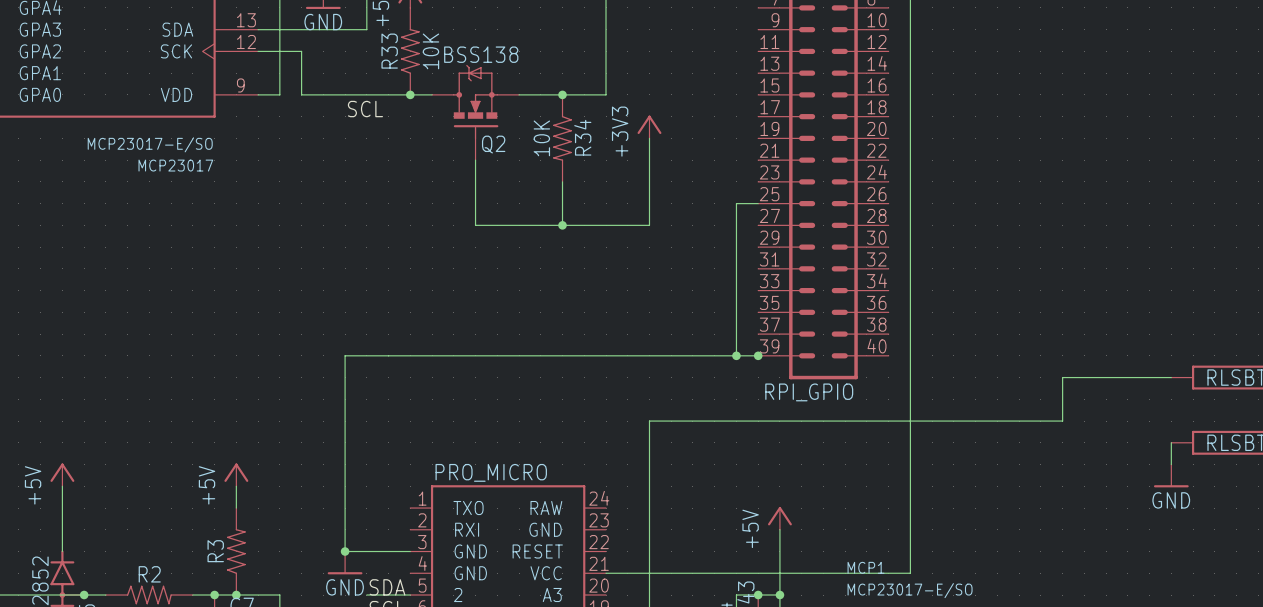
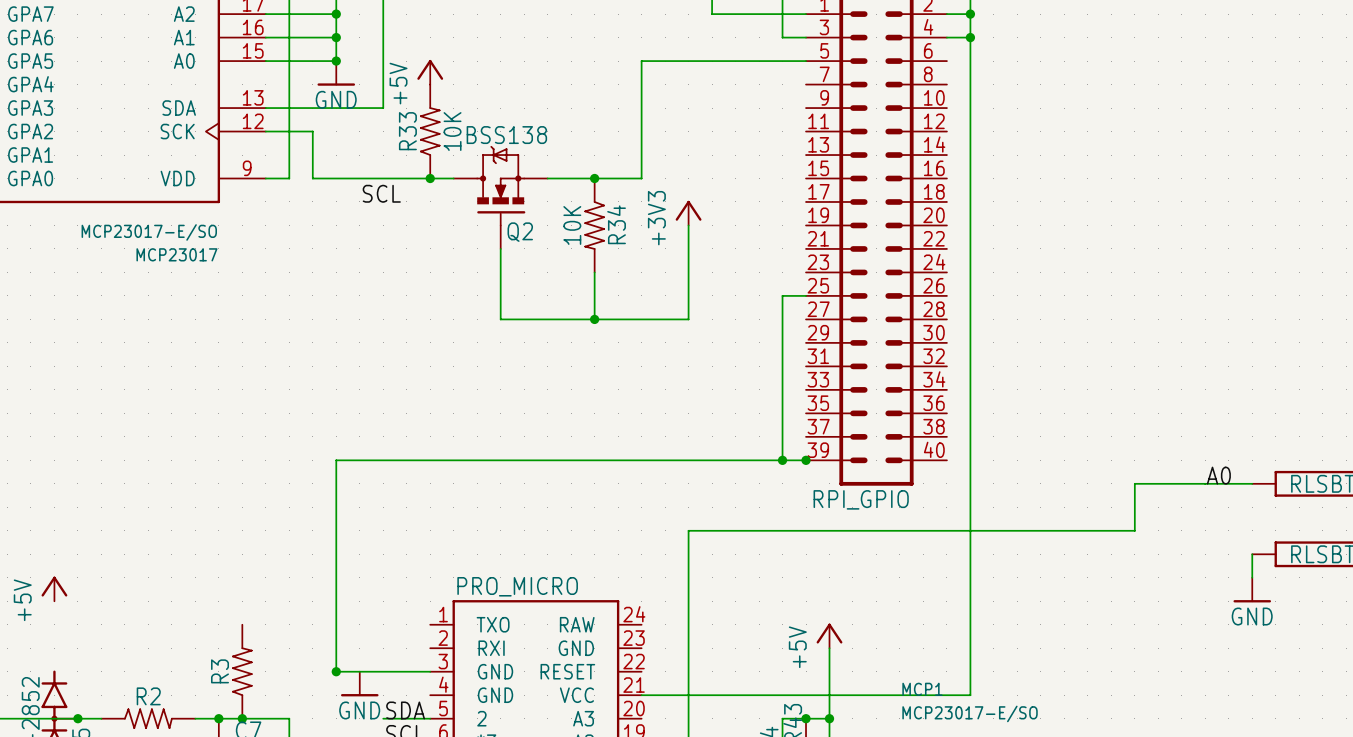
wire: (345, 355) (345, 551) -> (359, 460) (336, 460) (336, 671) (359, 671)
label: none -> A0 (1218, 475)
power symbol: +5V (236, 474) -> none
wire: (62, 486) (62, 551) -> none
wire: (236, 486) (236, 508) -> none
junction position: (345, 551) -> (336, 671)

